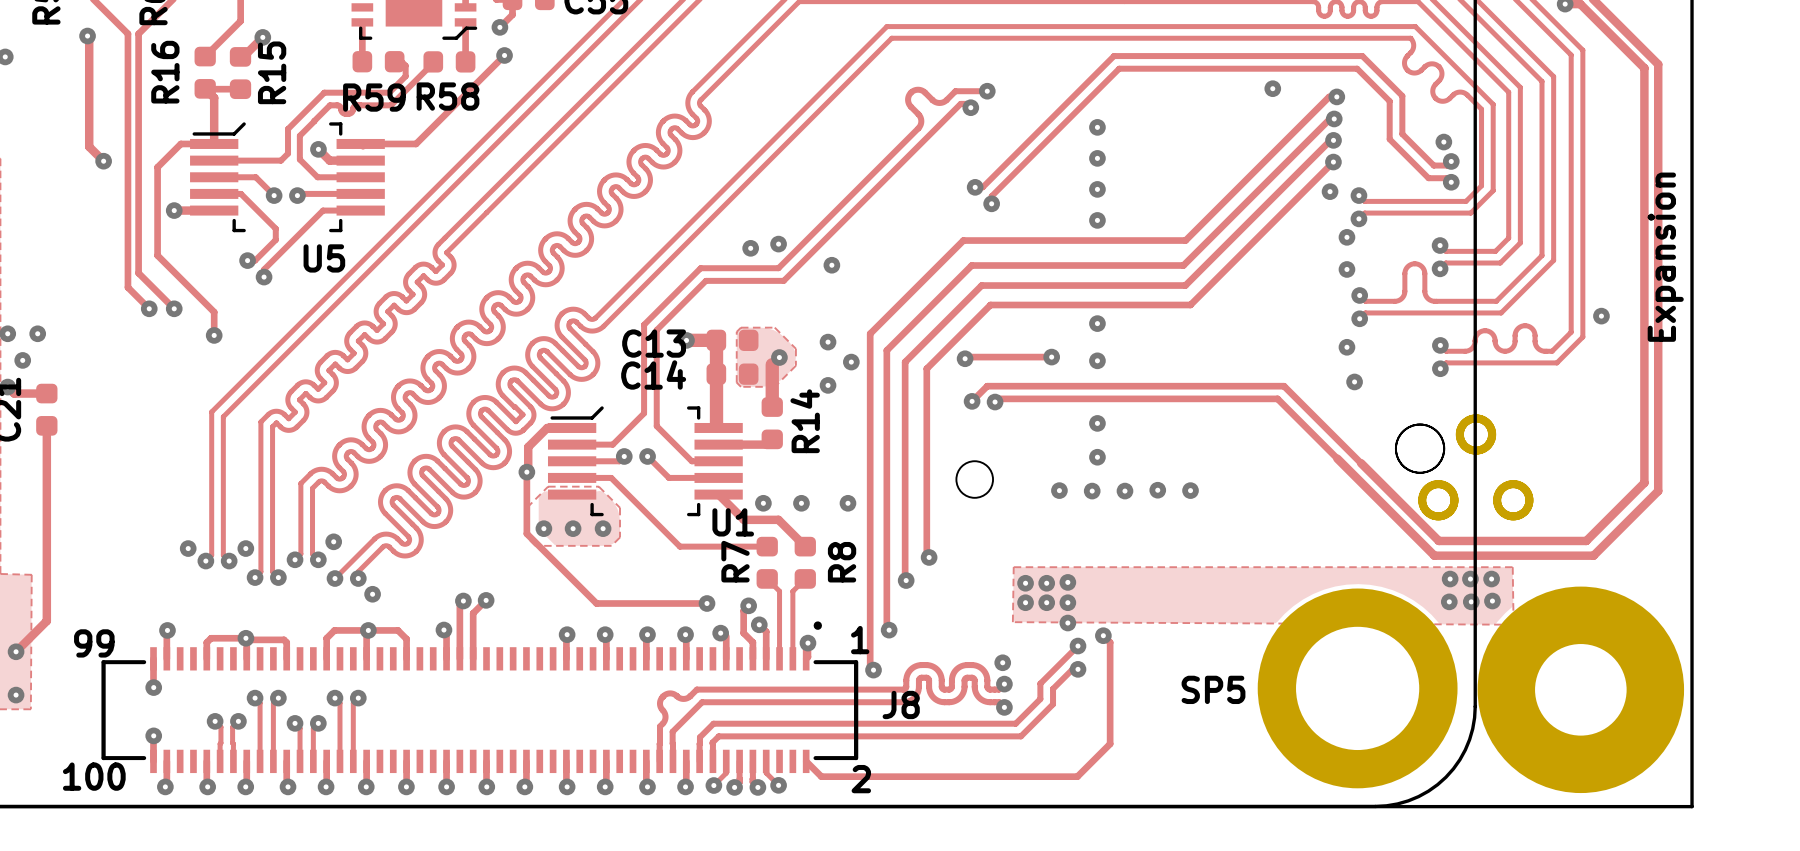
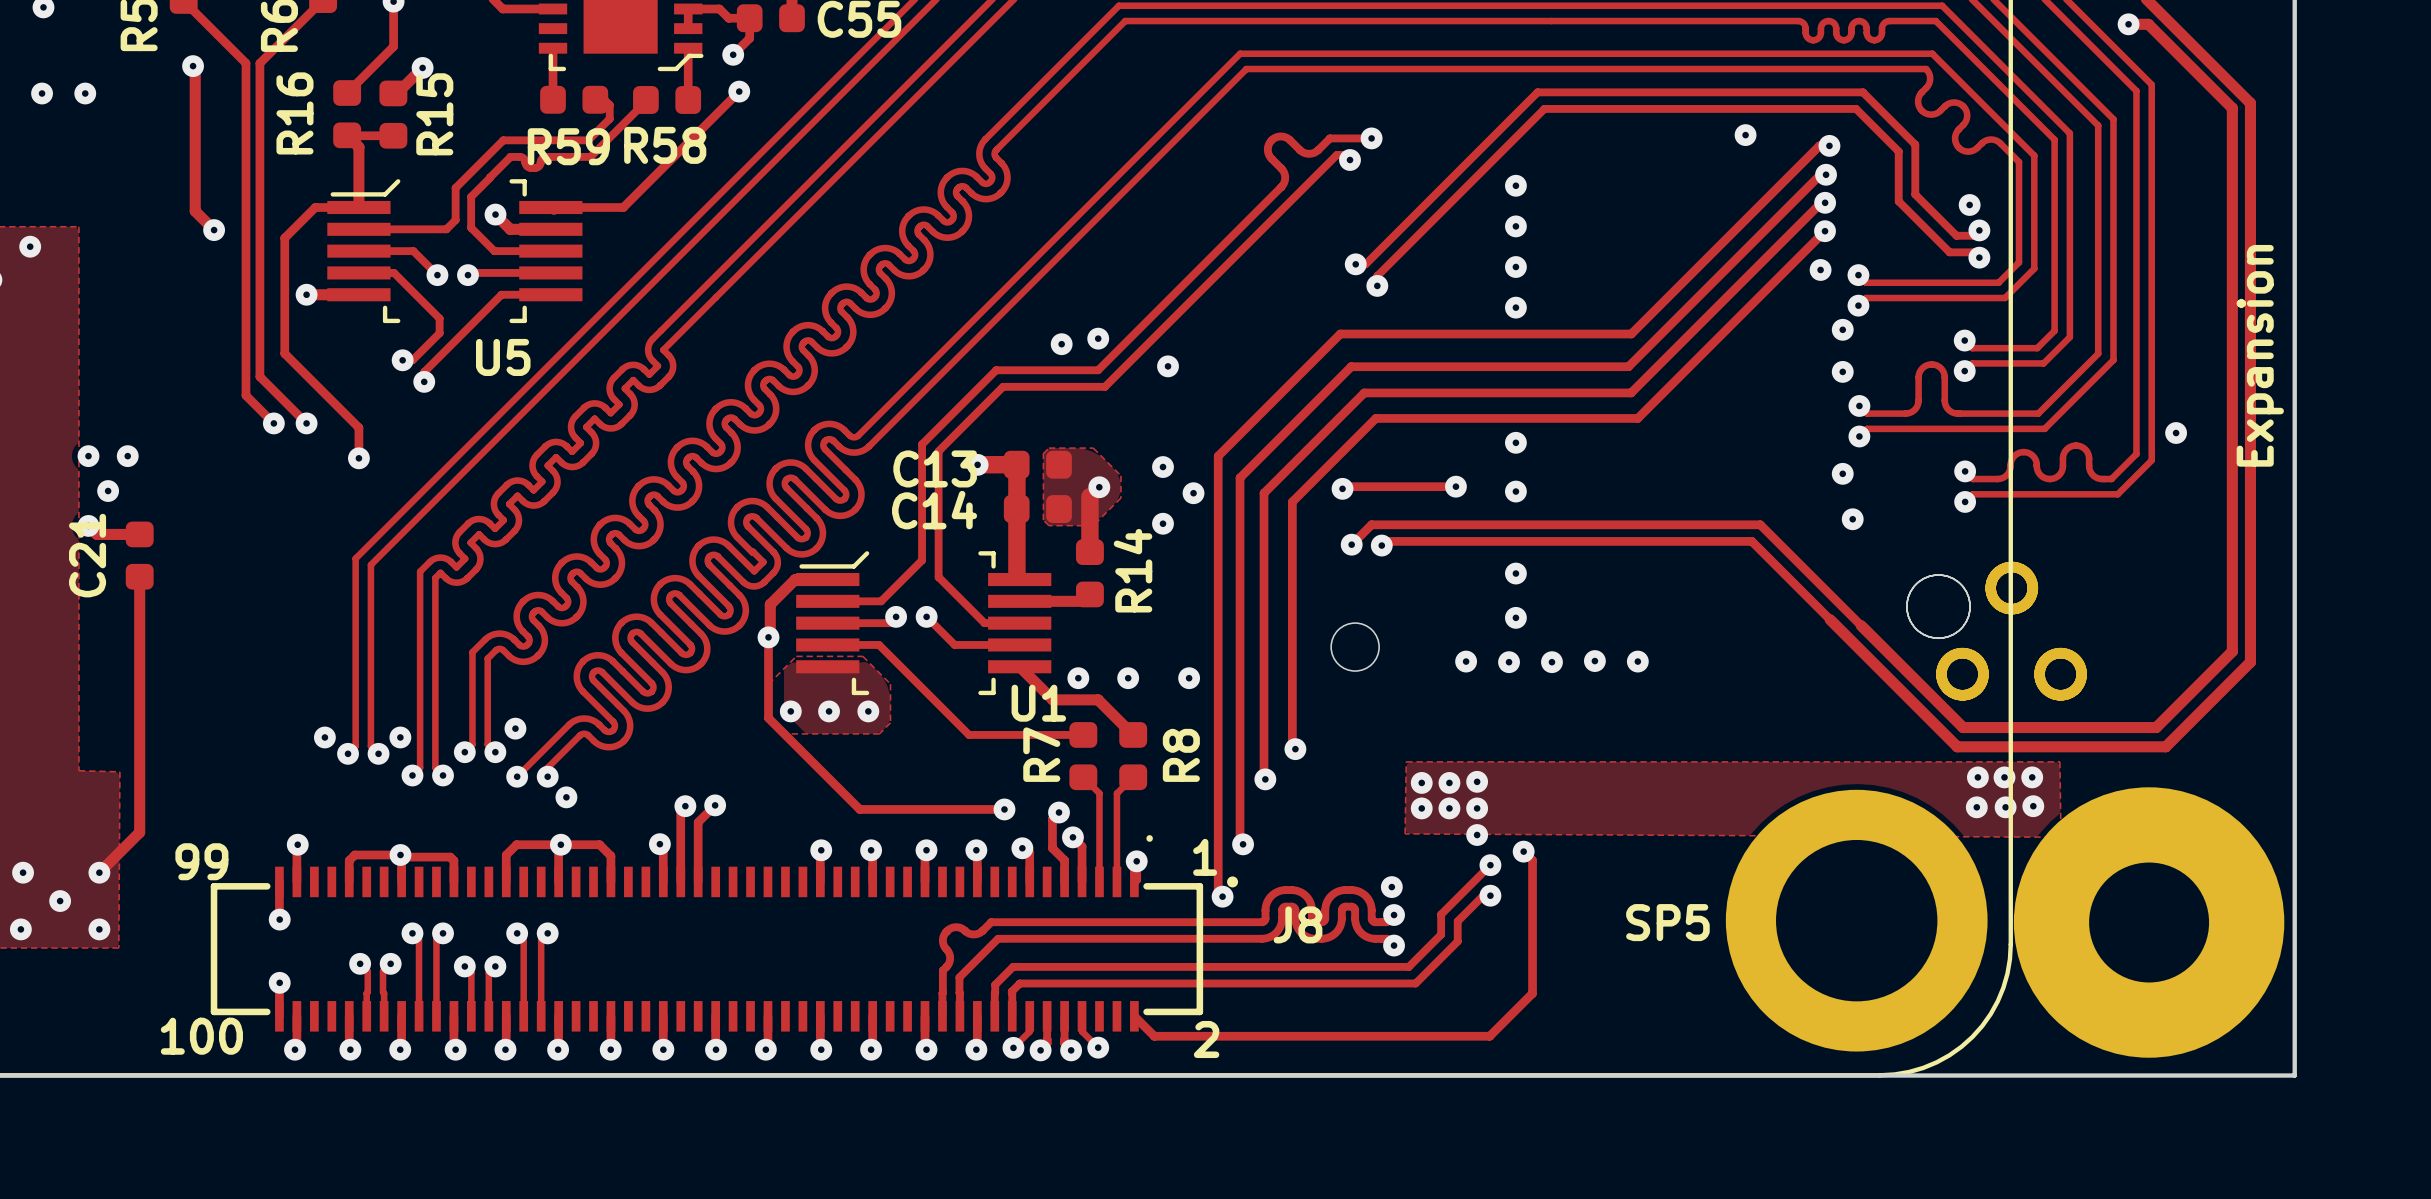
J8 footprint: [101, 621, 859, 774] -> [210, 835, 1239, 1032]
J8 name position: J8 (901, 704) -> J8 (1298, 924)

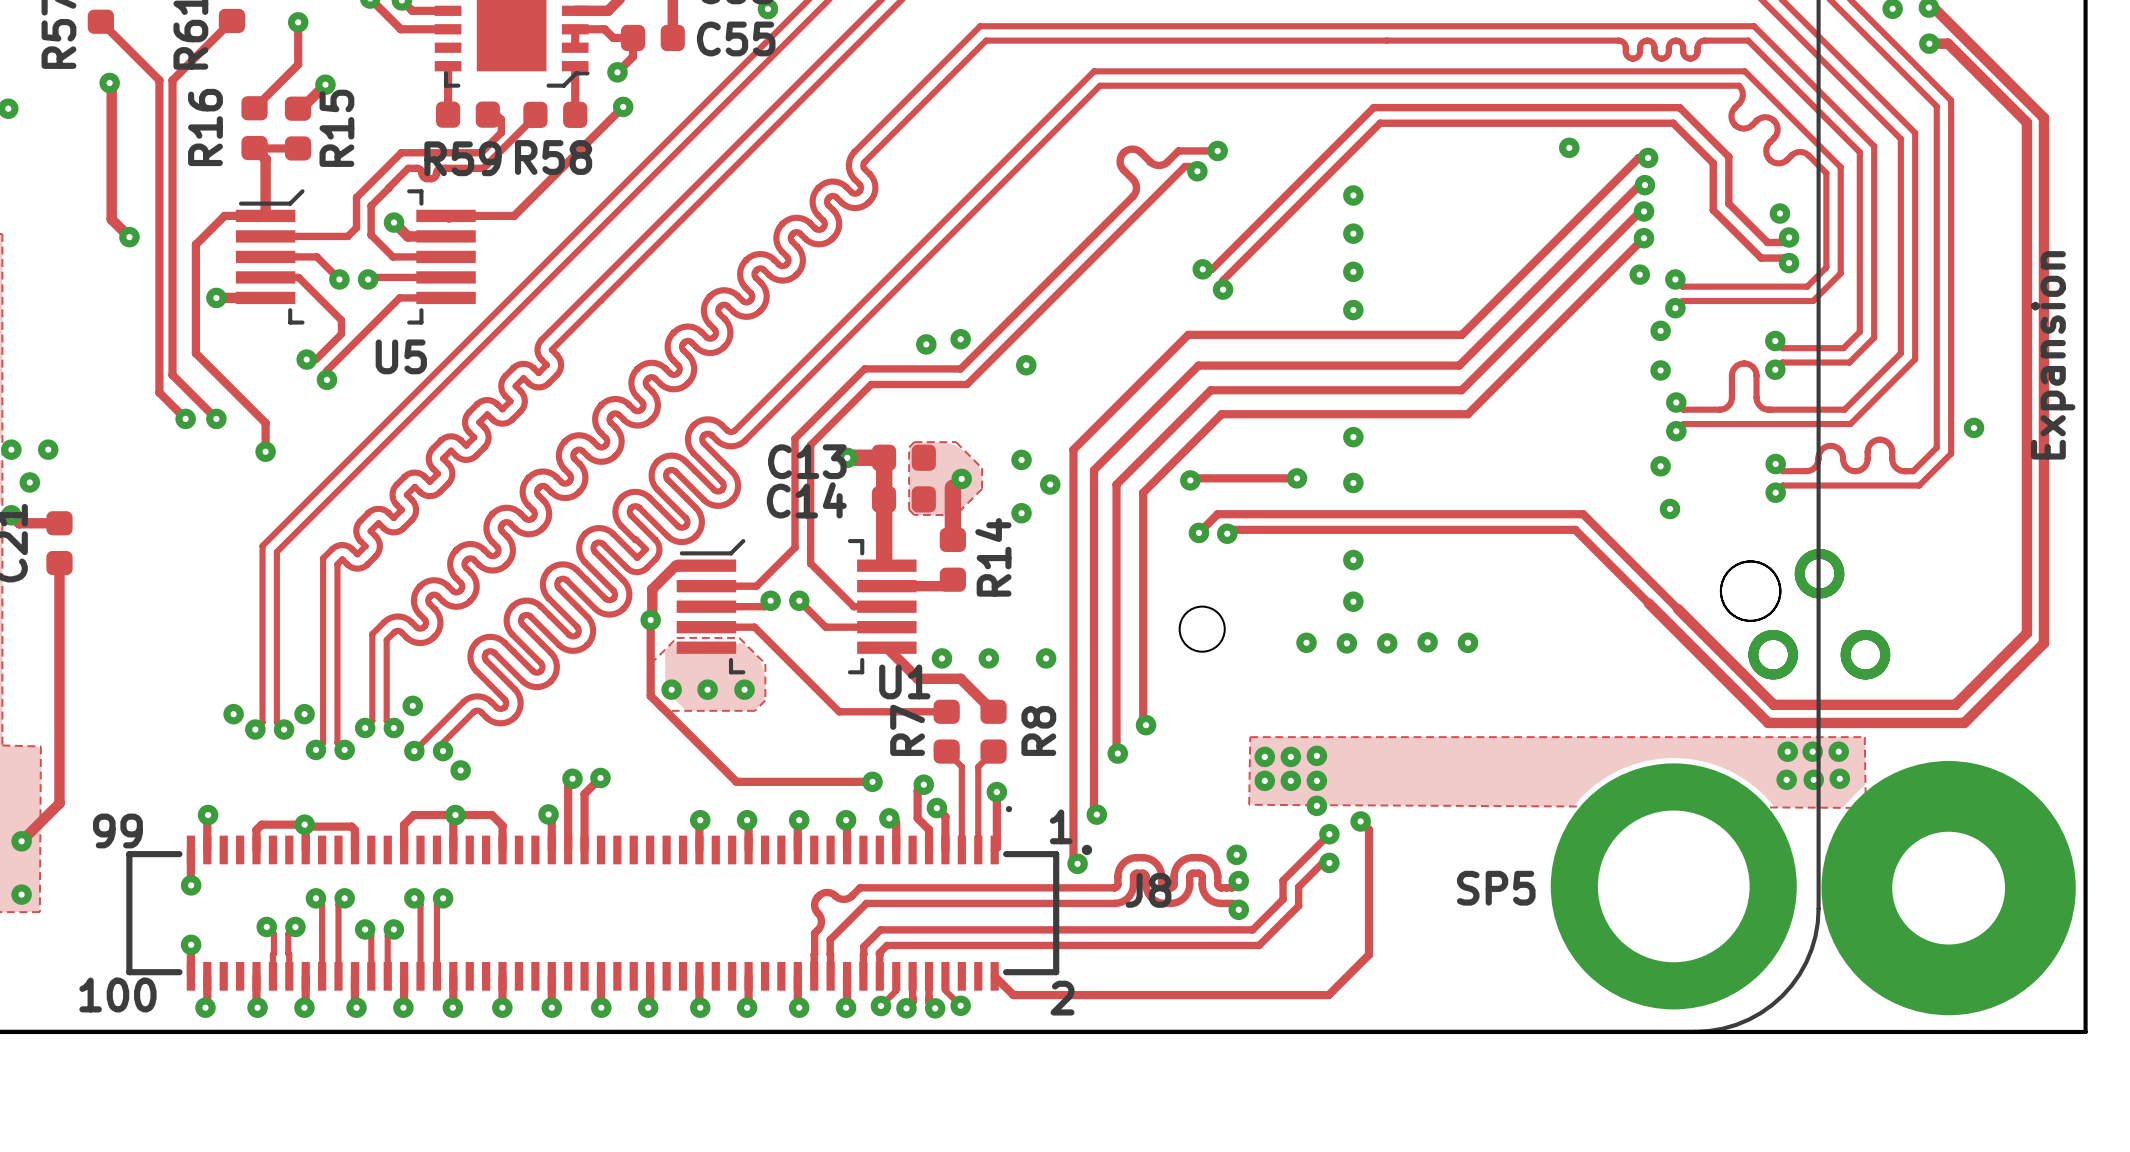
track: none -> (996, 792) (996, 830)
via position: (1136, 861) -> (996, 792)

